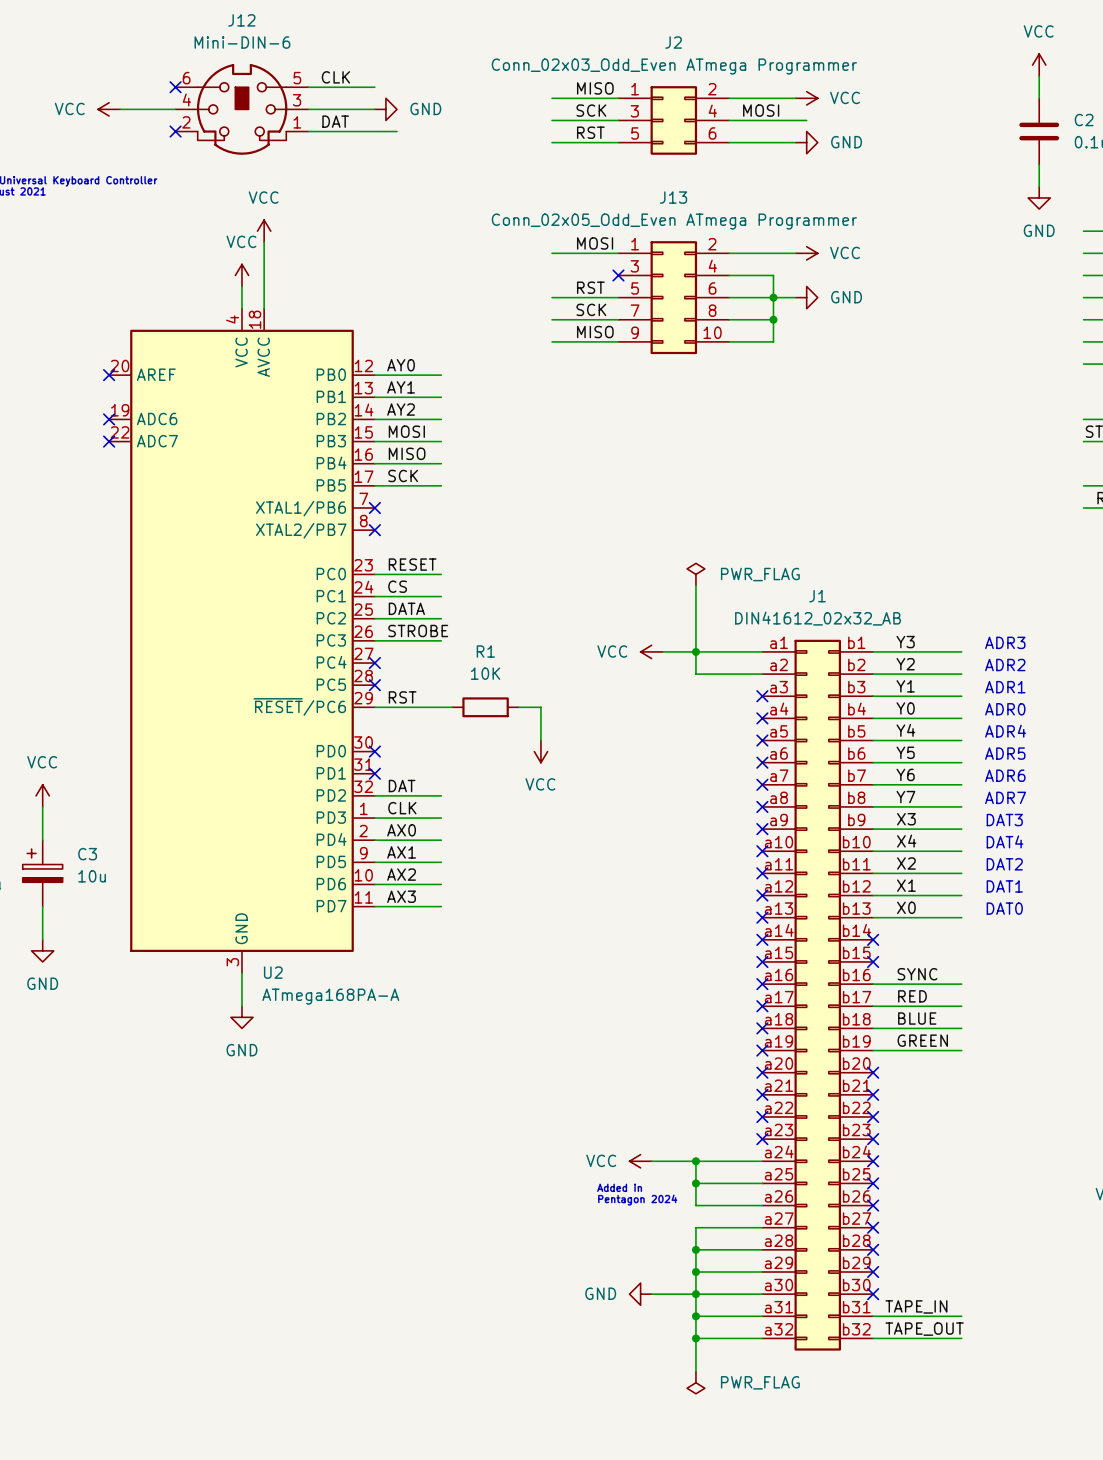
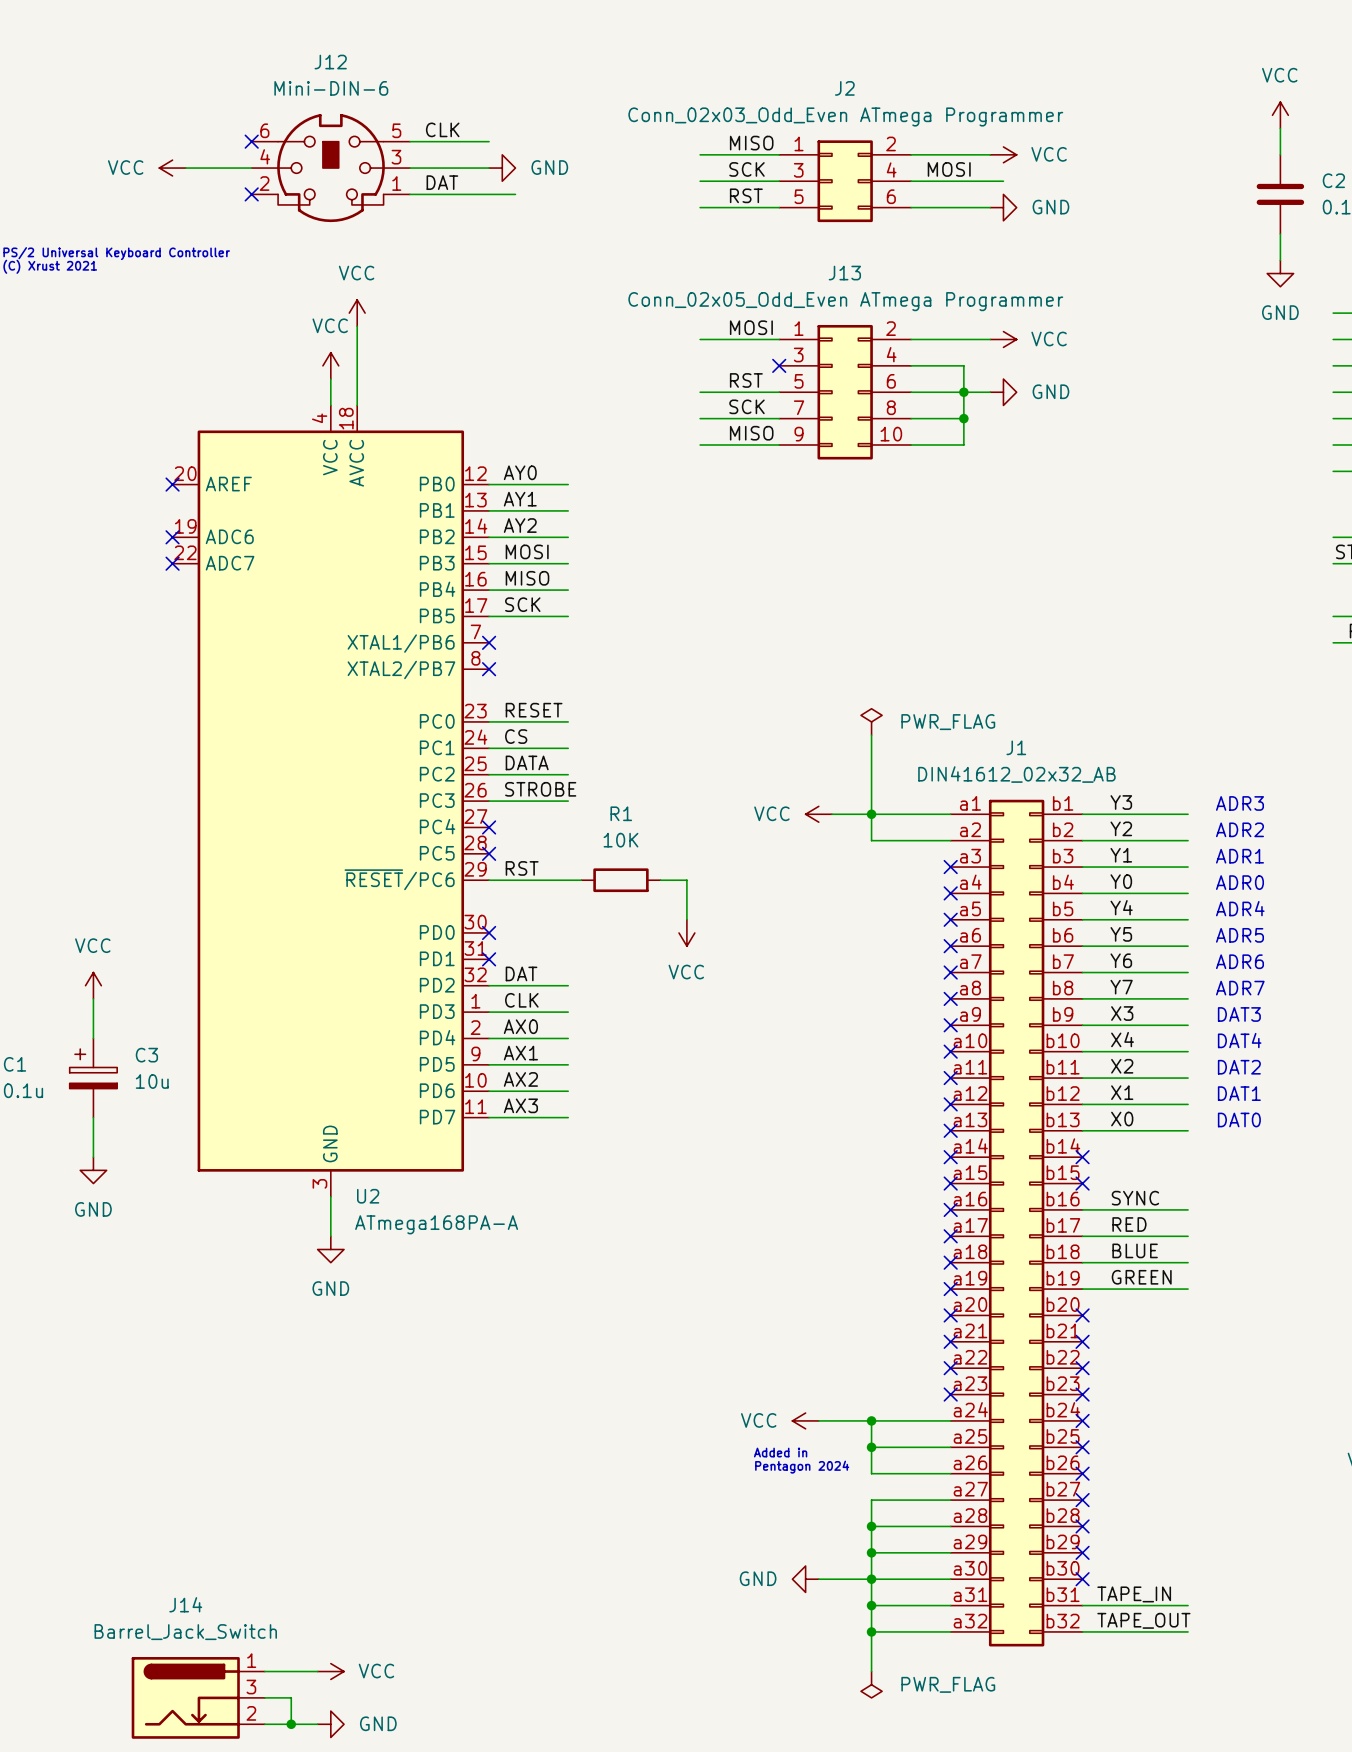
wire: none -> (264, 1671) (317, 1671)
power symbol: none -> VCC (330, 1671)
J14: none -> Barrel_Jack_Switch (198, 1697)
wire: none -> (264, 1697) (291, 1697) (291, 1724)
wire: none -> (264, 1724) (317, 1724)
junction: none -> (291, 1724)
power symbol: none -> GND (330, 1724)

